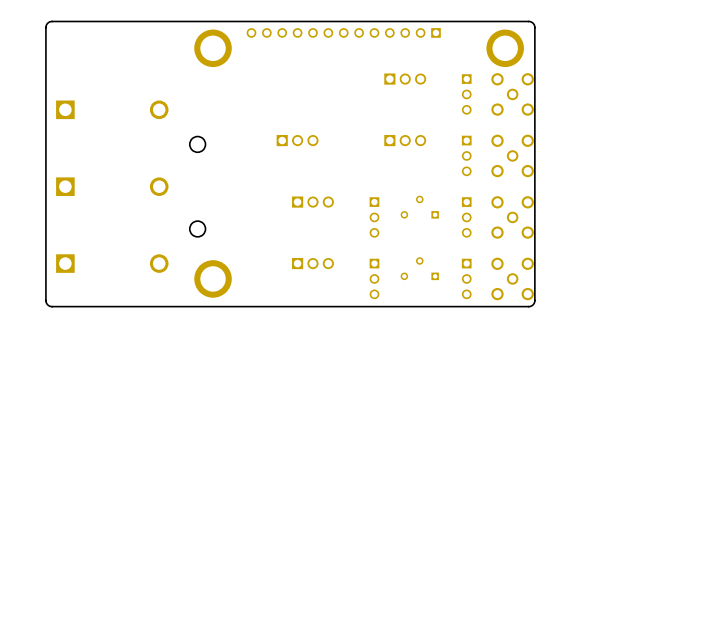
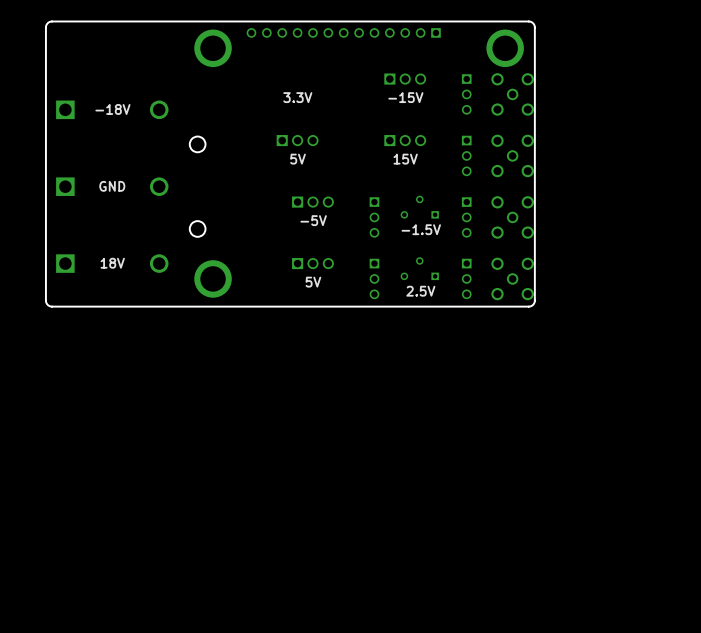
text: none -> 3.3V (297, 97)
text: none -> -15V (405, 97)
text: none -> -18V (112, 109)
text: none -> 5V (298, 159)
text: none -> 15V (405, 159)
text: none -> GND (112, 186)
text: none -> -5V (313, 220)
text: none -> -1.5V (421, 229)
text: none -> 18V (112, 263)
text: none -> 5V (313, 282)
text: none -> 2.5V (420, 291)

